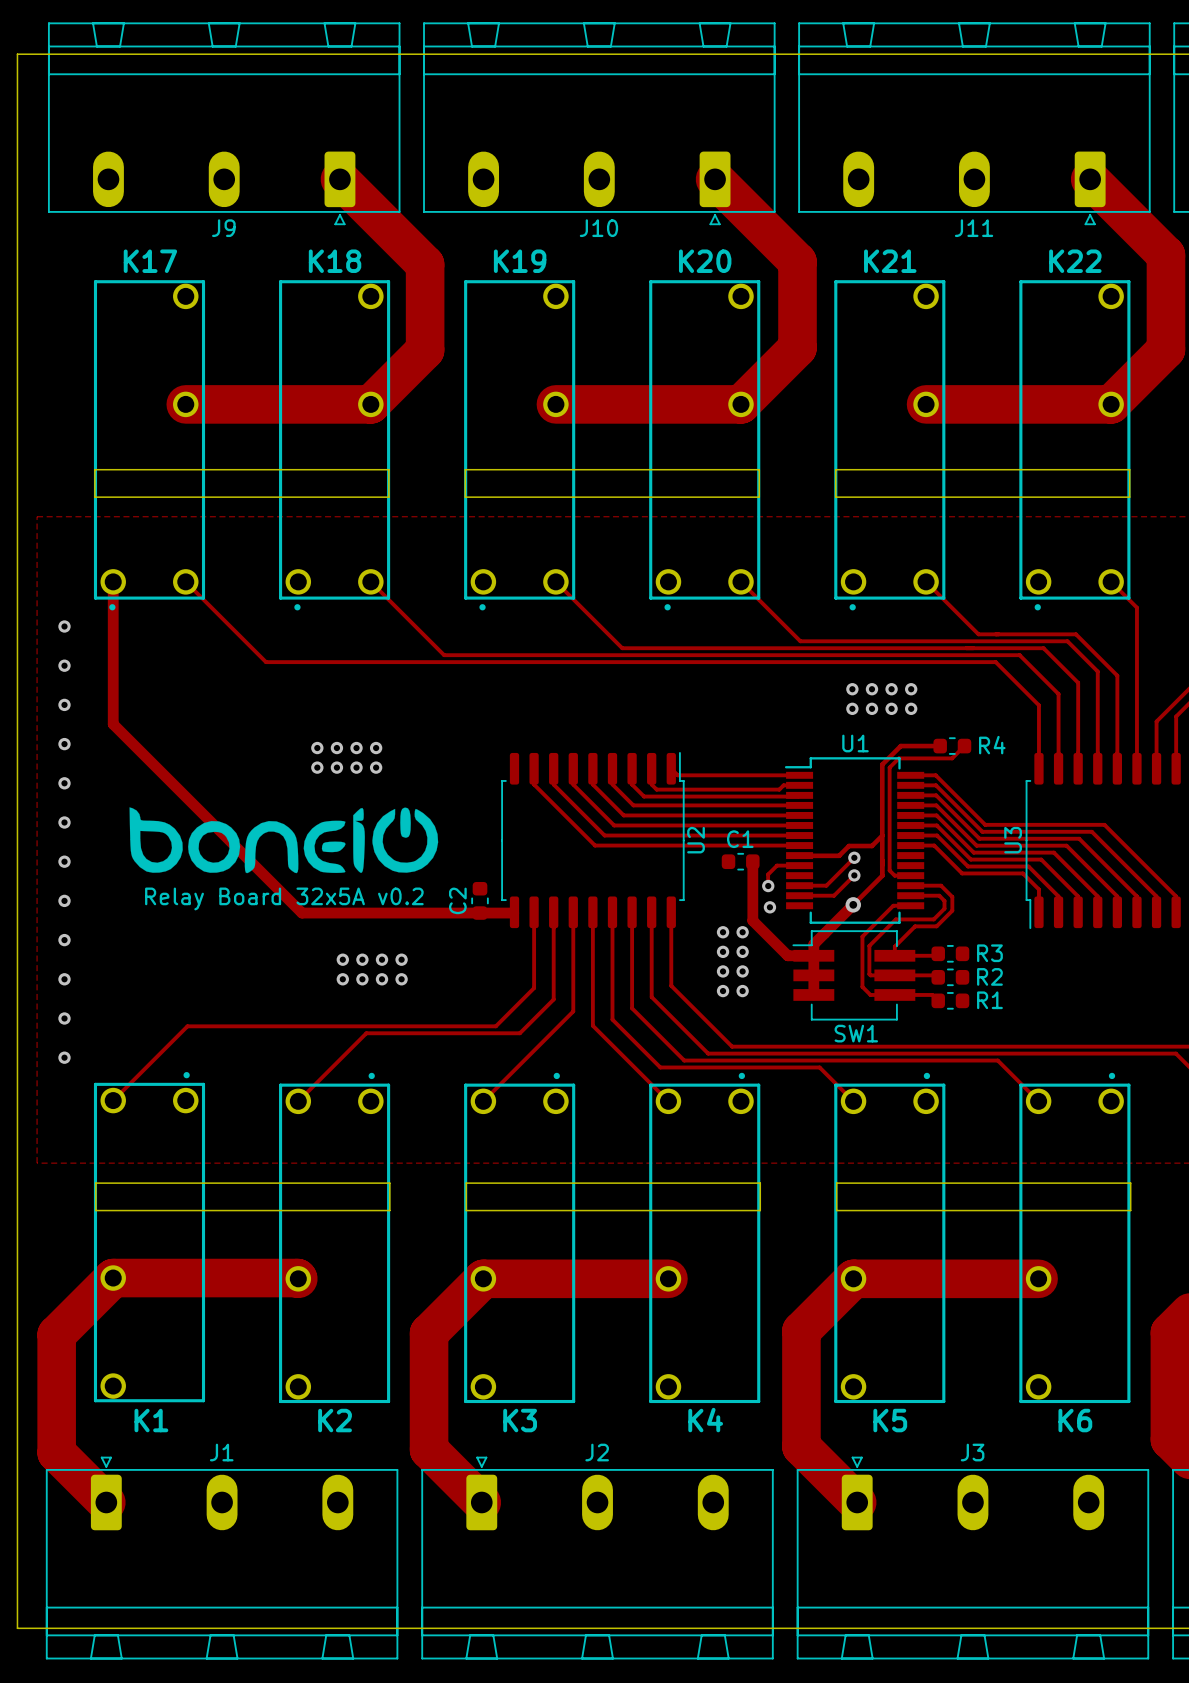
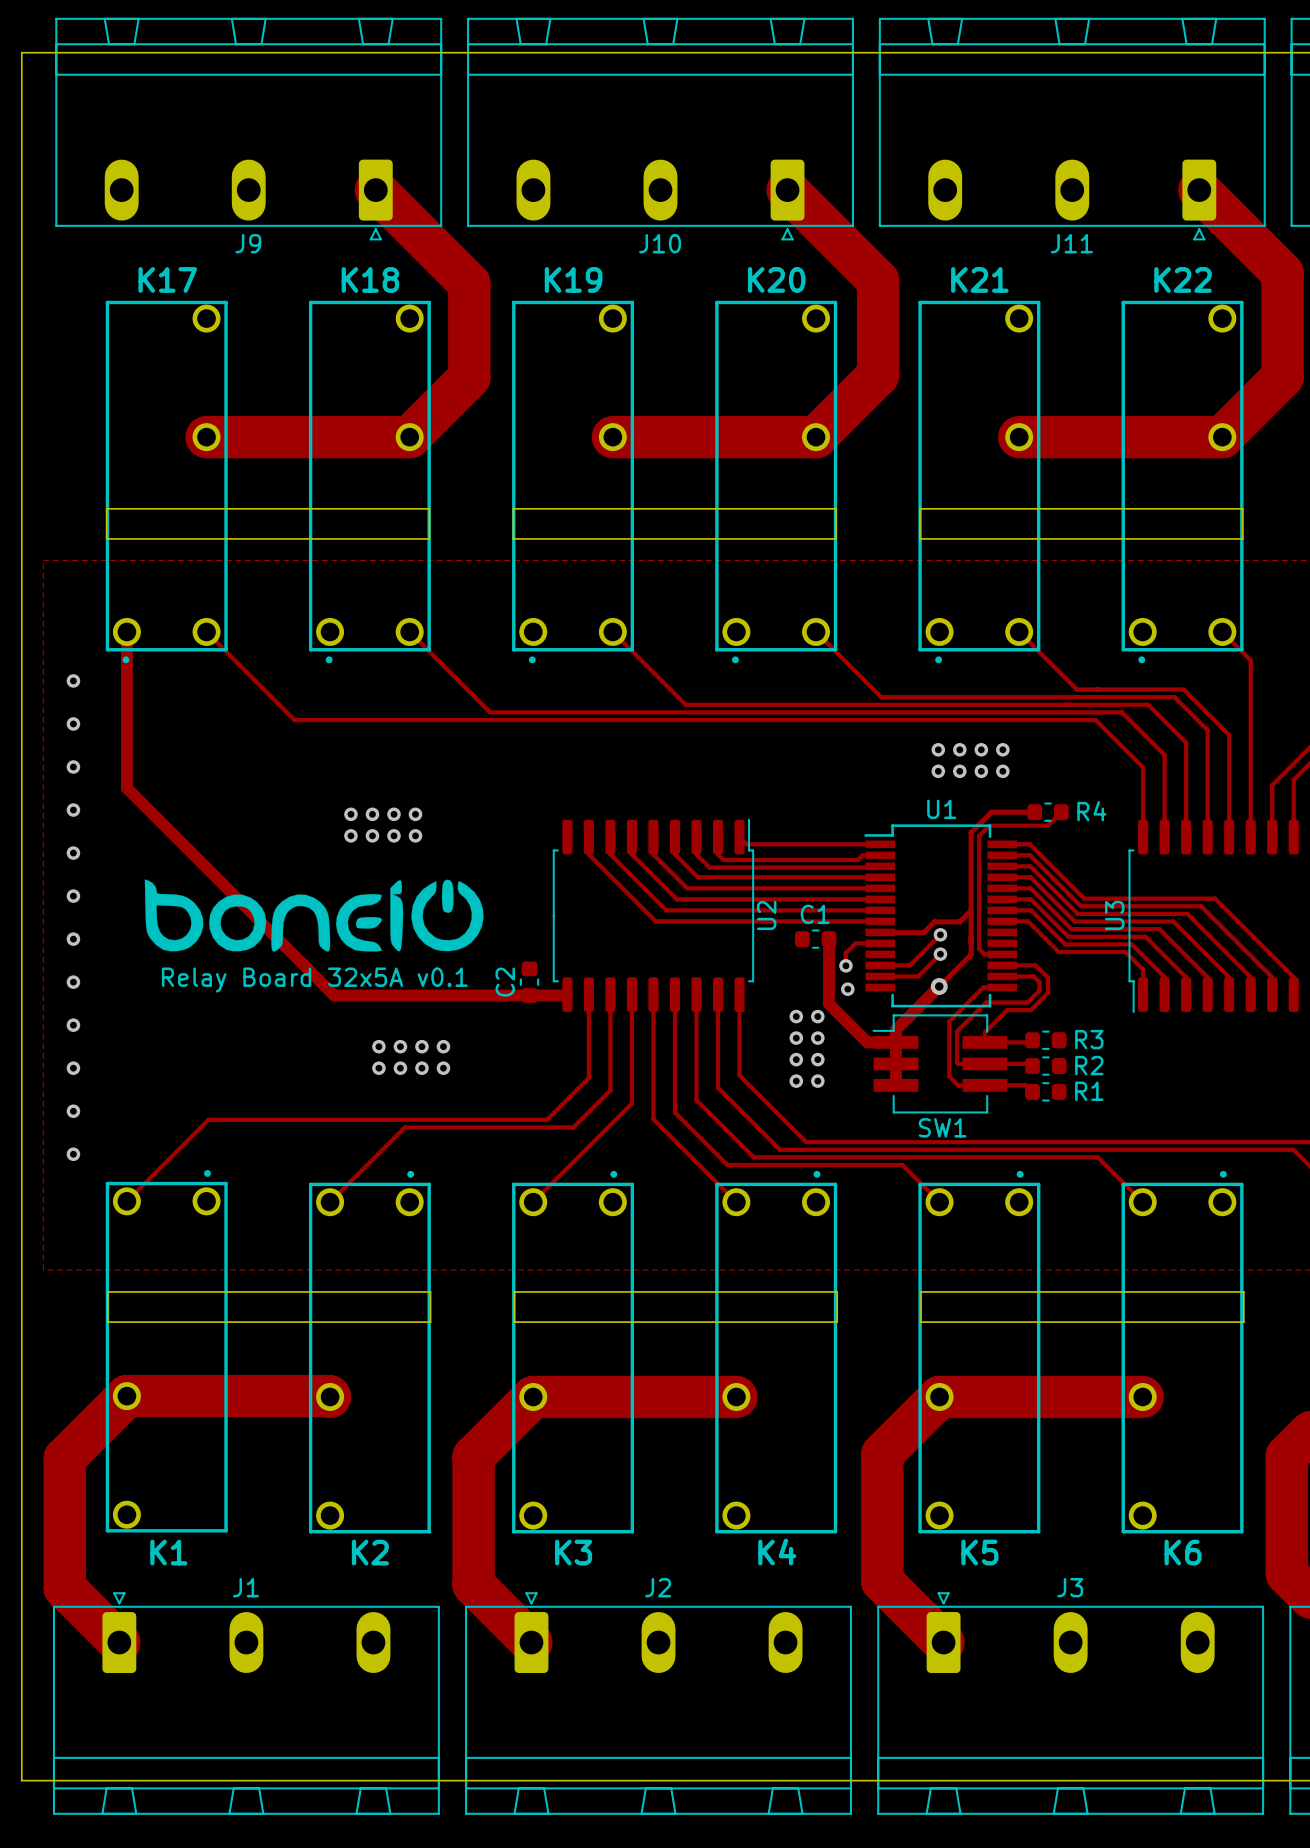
text: Relay Board 32x5A v0.2 (284, 898) -> Relay Board 32x5A v0.1 (314, 980)

